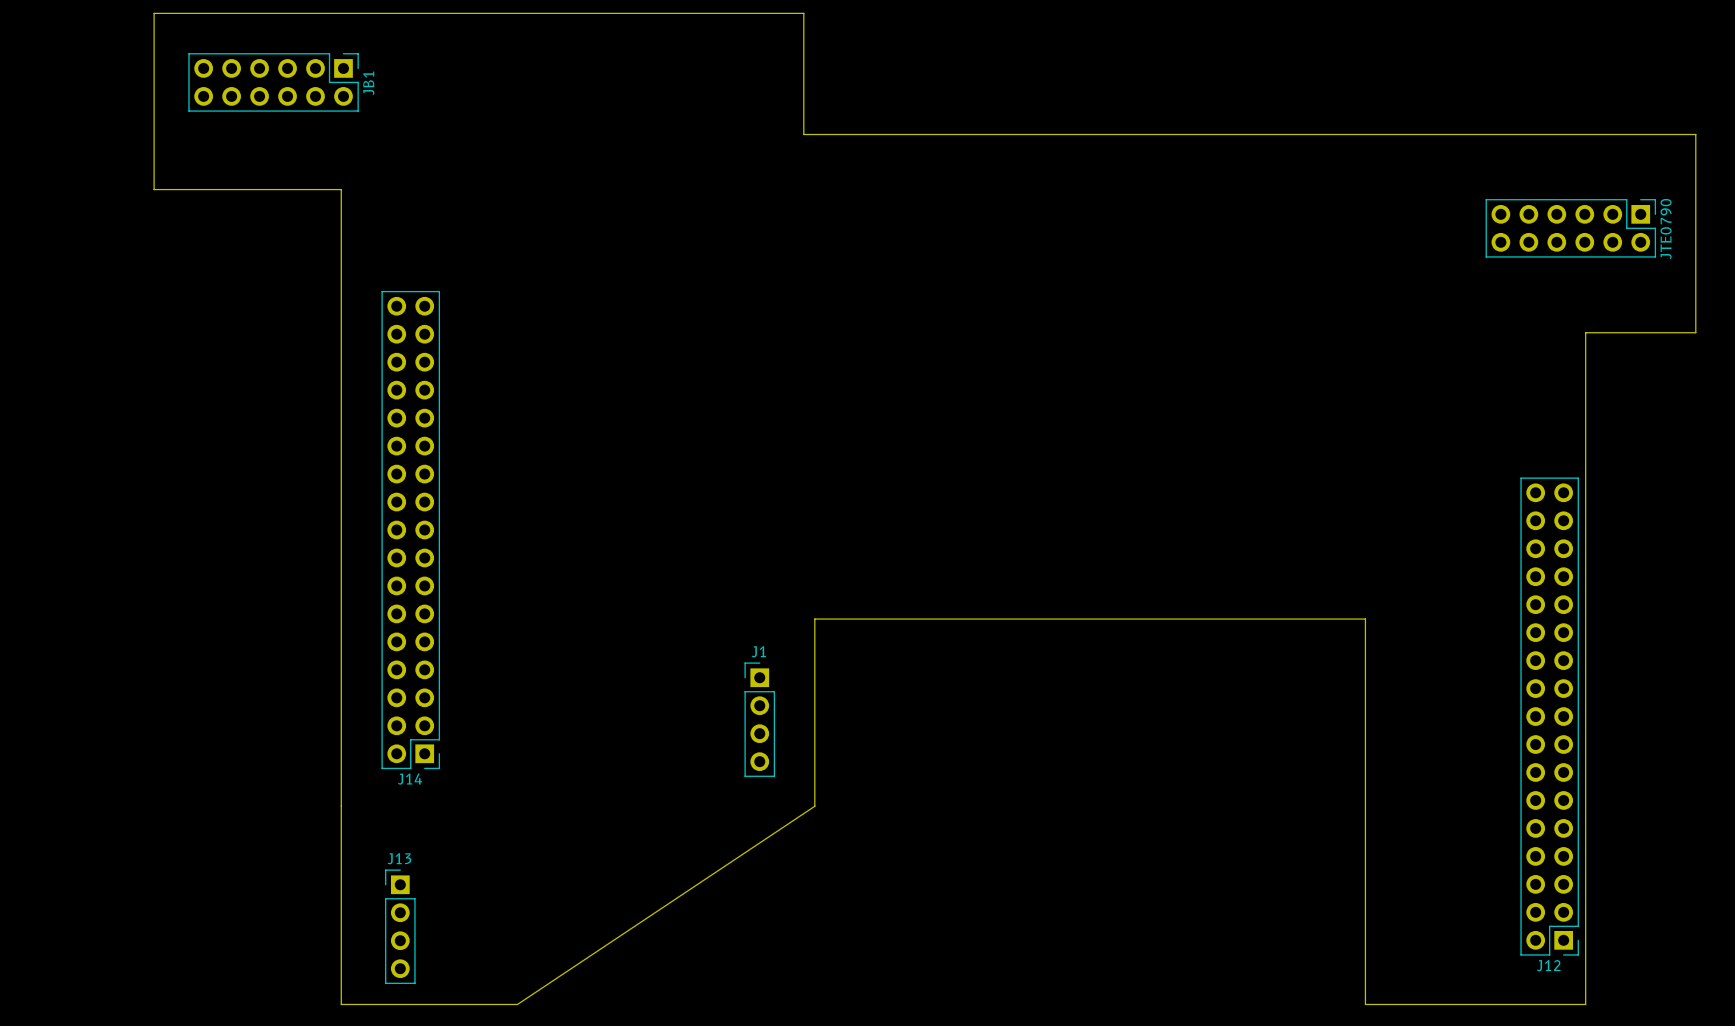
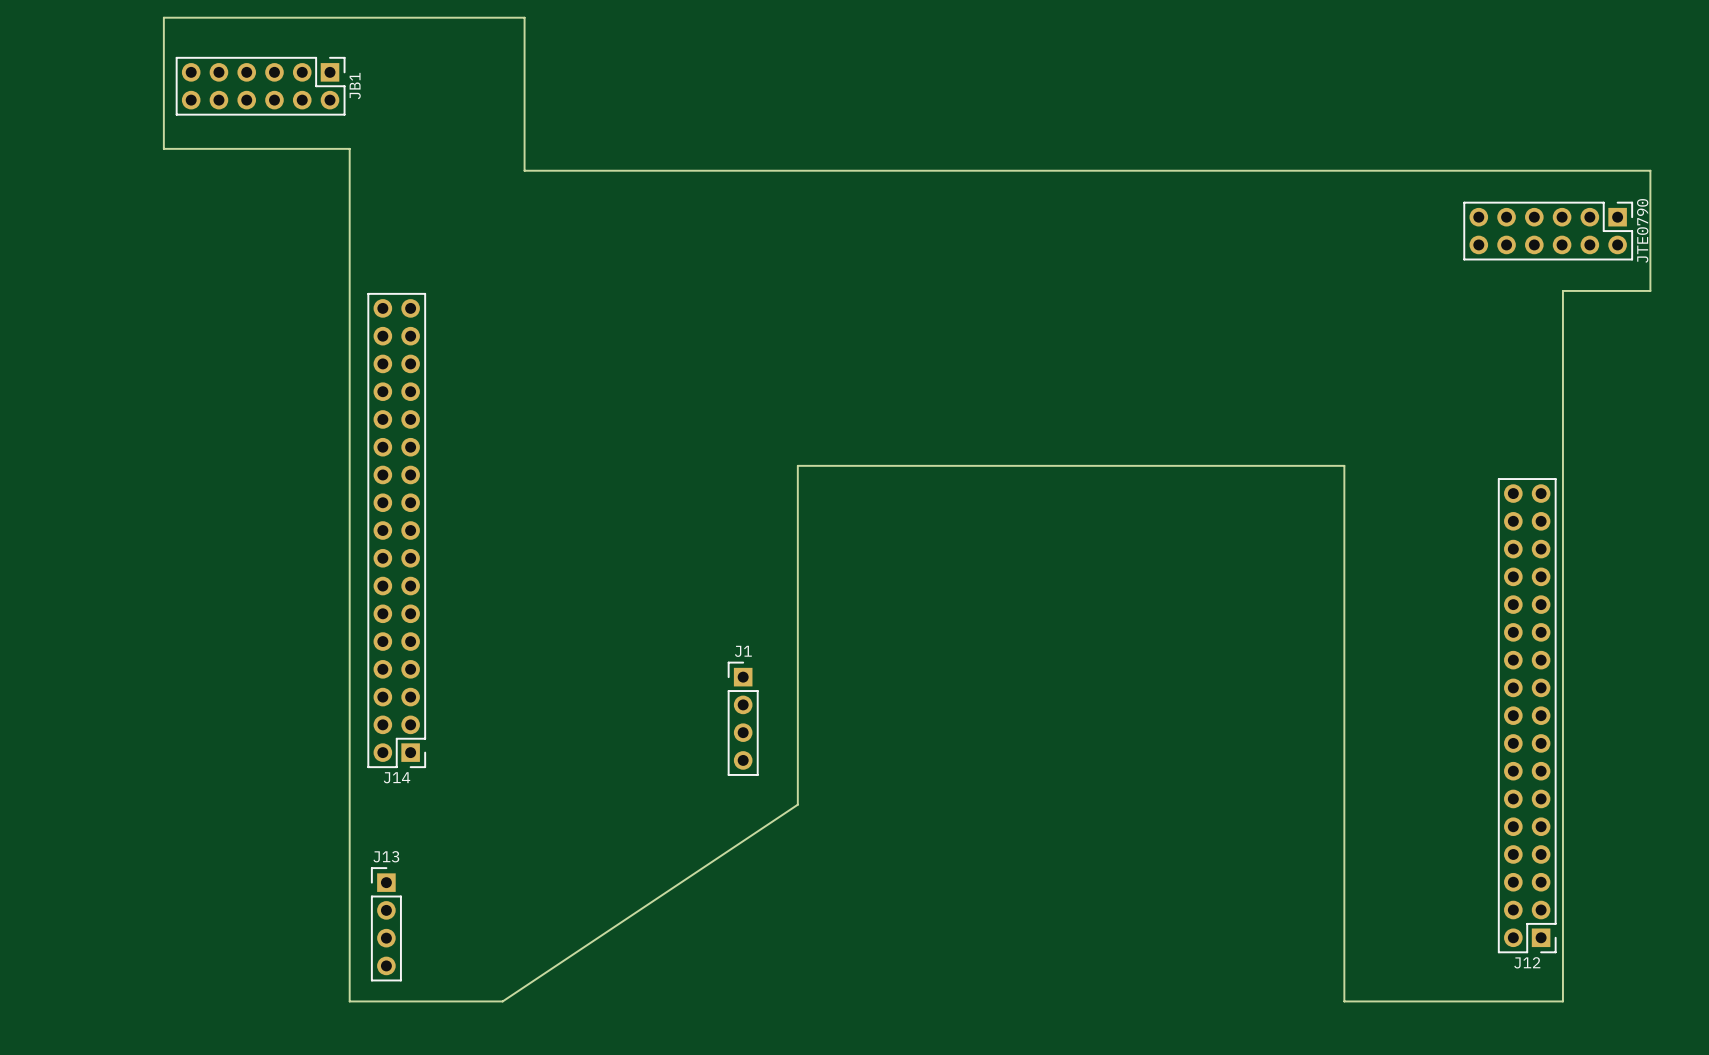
board edge: (176, 13) (154, 13) (154, 189) (341, 189) (341, 1004) (363, 1004) -> (163, 17) (163, 148) (349, 148) (349, 1001)
board edge: (539, 13) (803, 13) (803, 134) (1695, 134) (1695, 332) (1585, 332) -> (524, 17) (524, 170) (1650, 170) (1650, 290) (1562, 290) (1562, 334)
board edge: (814, 619) (1365, 619) -> (797, 618) (797, 465) (1344, 465) (1344, 618)

